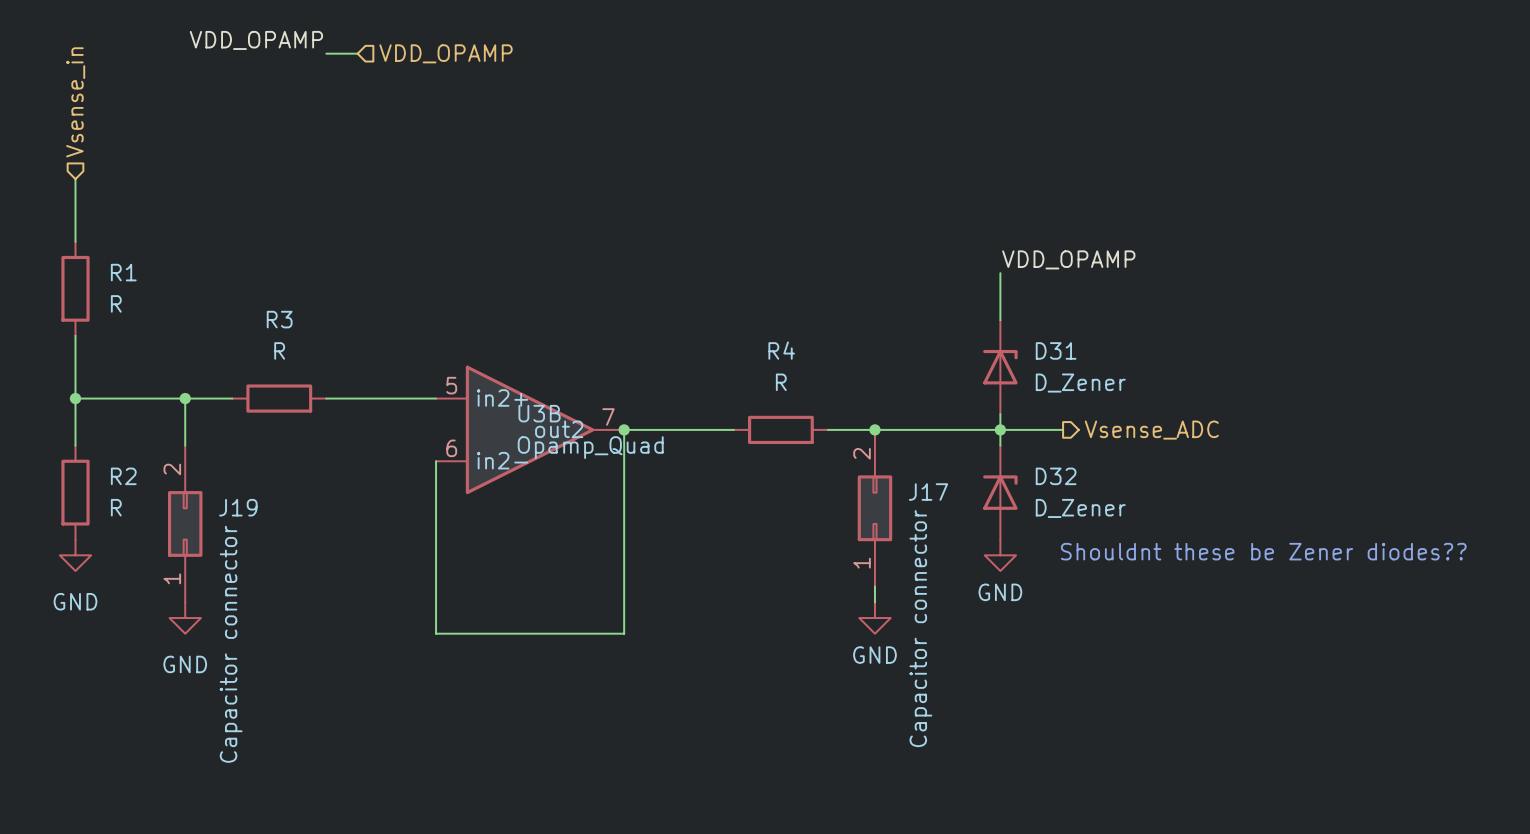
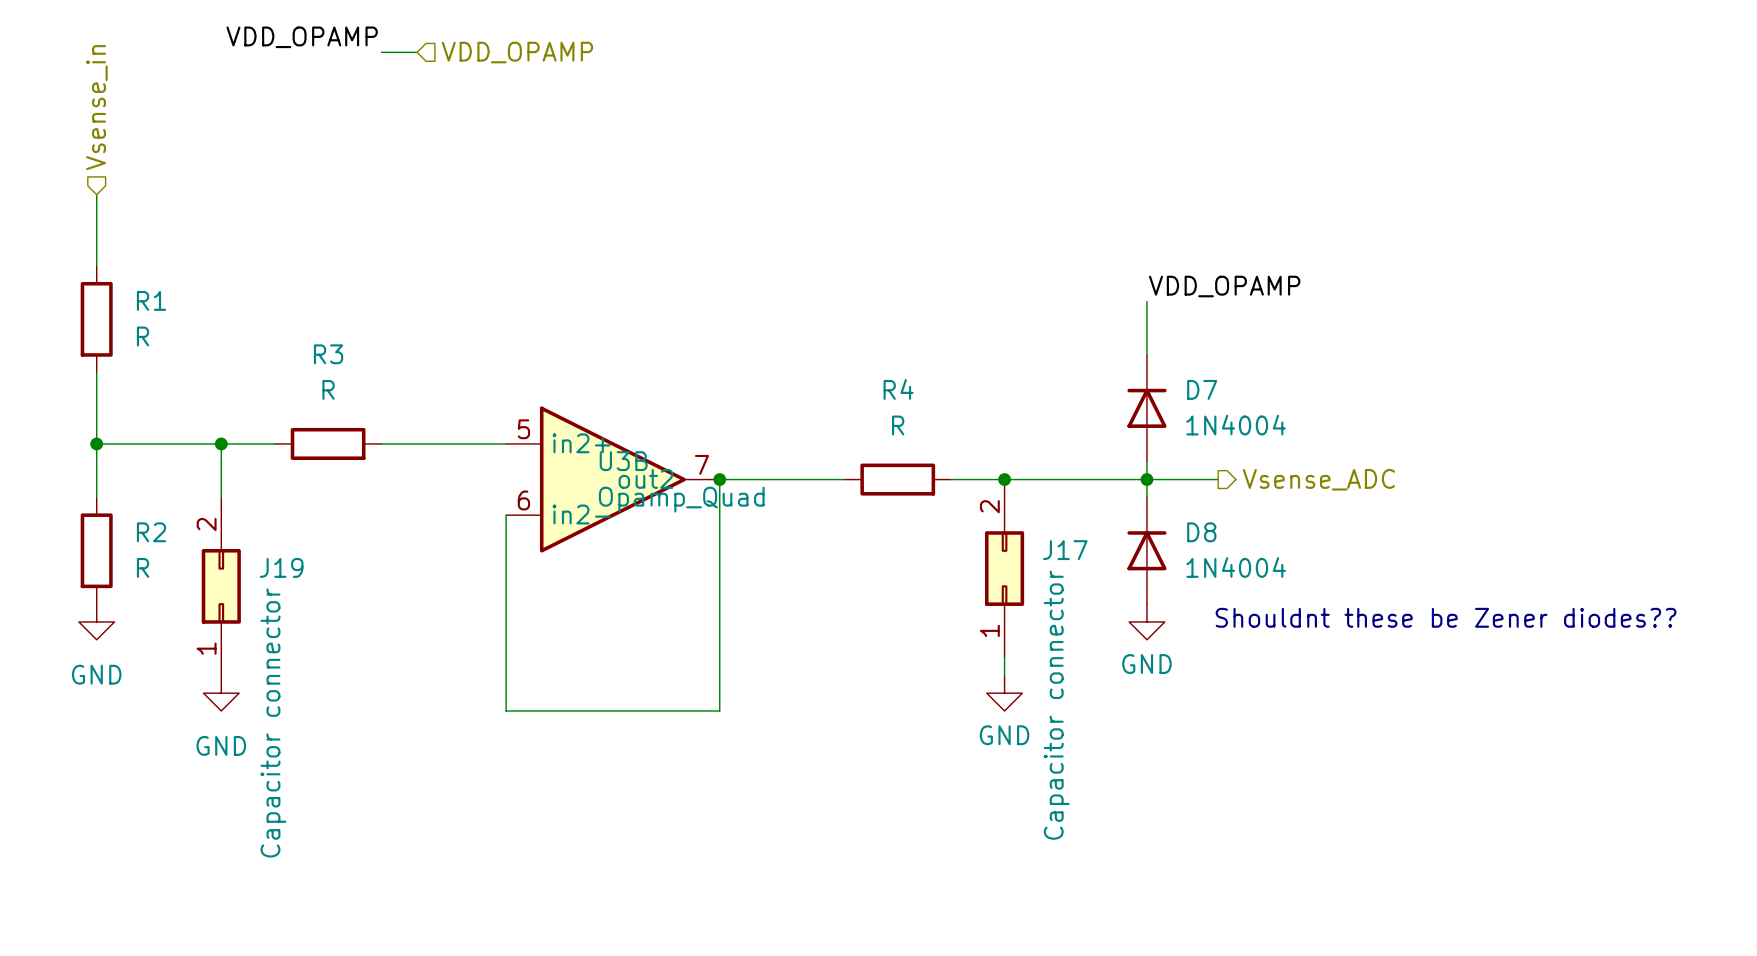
D31: D_Zener (1000, 367) -> none
D7: none -> 1N4004 (1146, 408)
D32: D_Zener (1000, 492) -> none
D8: none -> 1N4004 (1146, 550)

